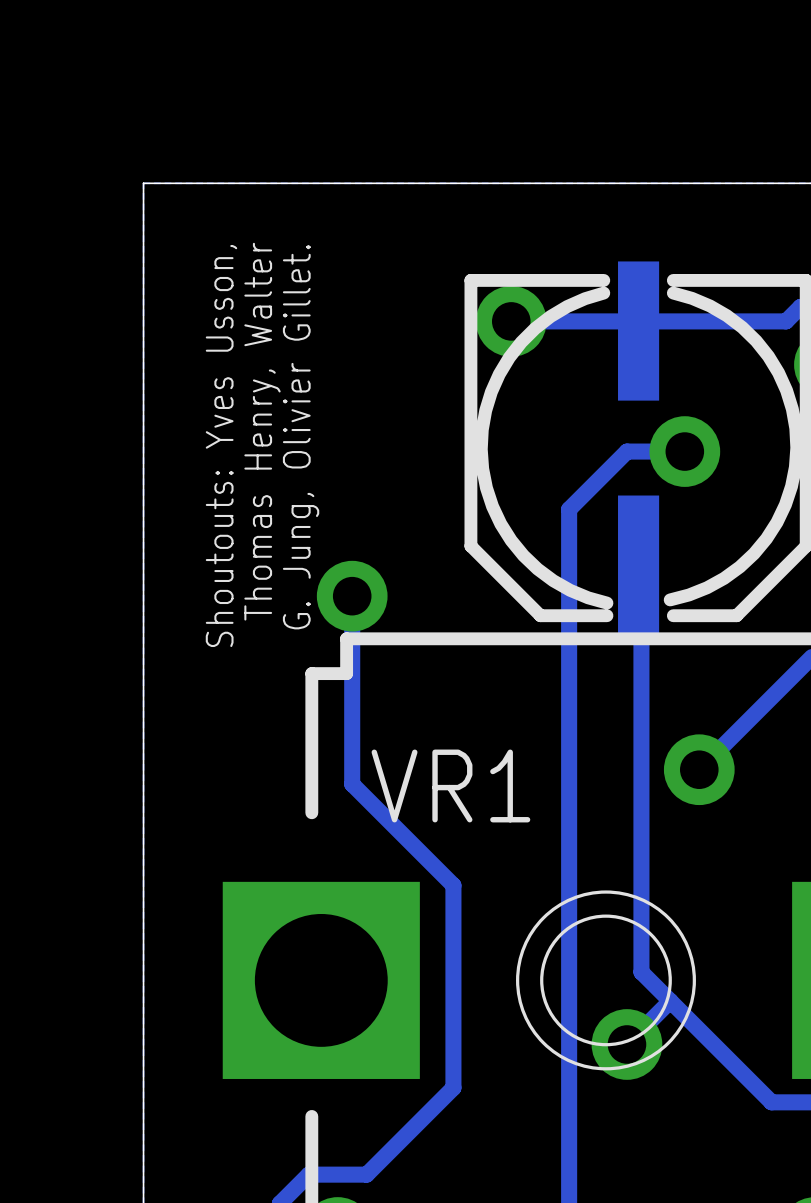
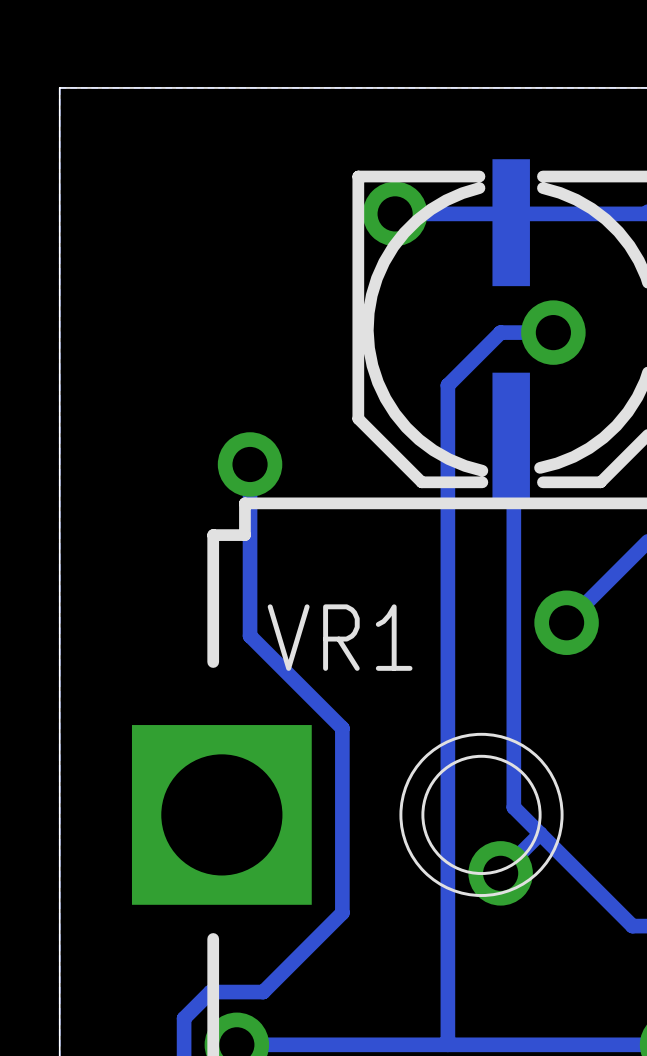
text: Thomas Henry, Walter (262, 431) -> none
text: G. Jung, Olivier Gillet. (301, 437) -> none
text: Shoutouts: Yves Usson, (221, 445) -> none

